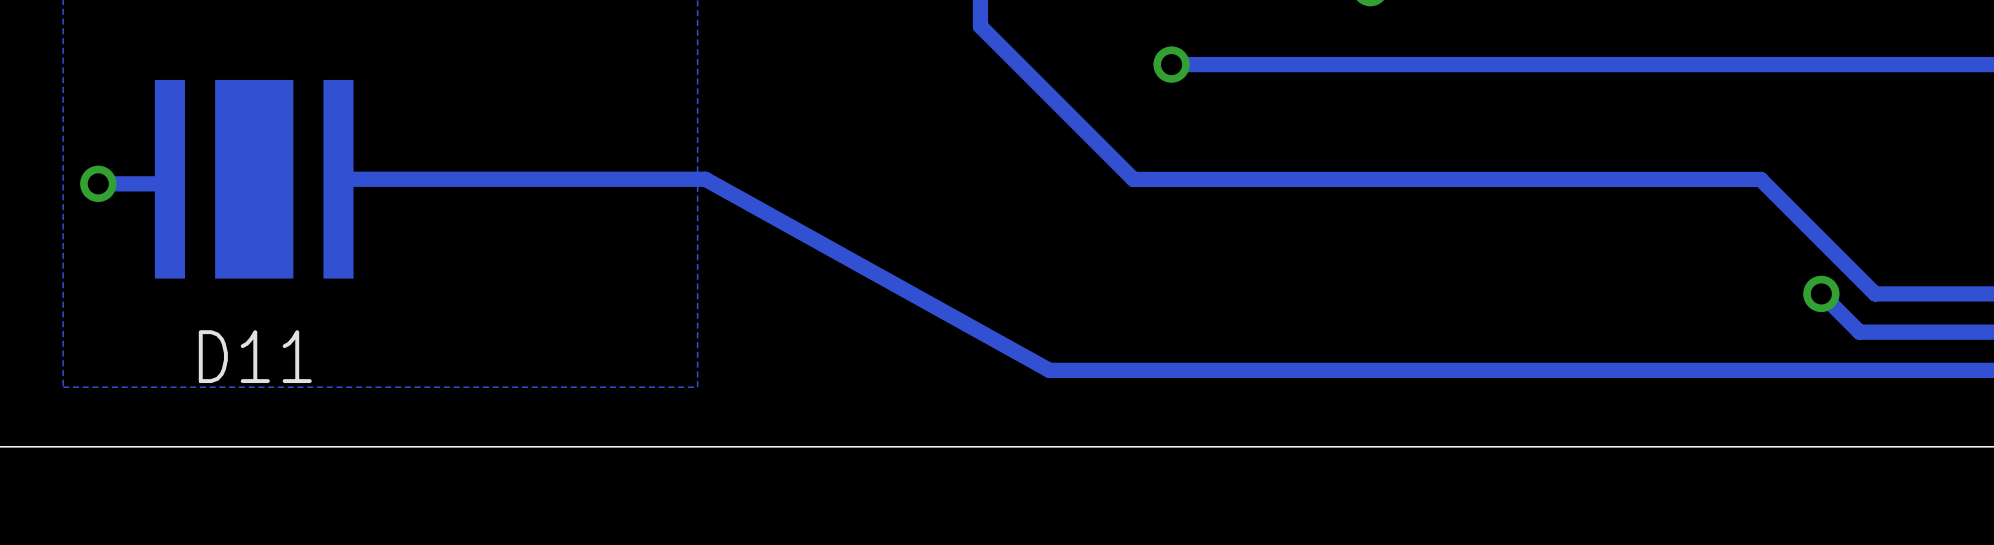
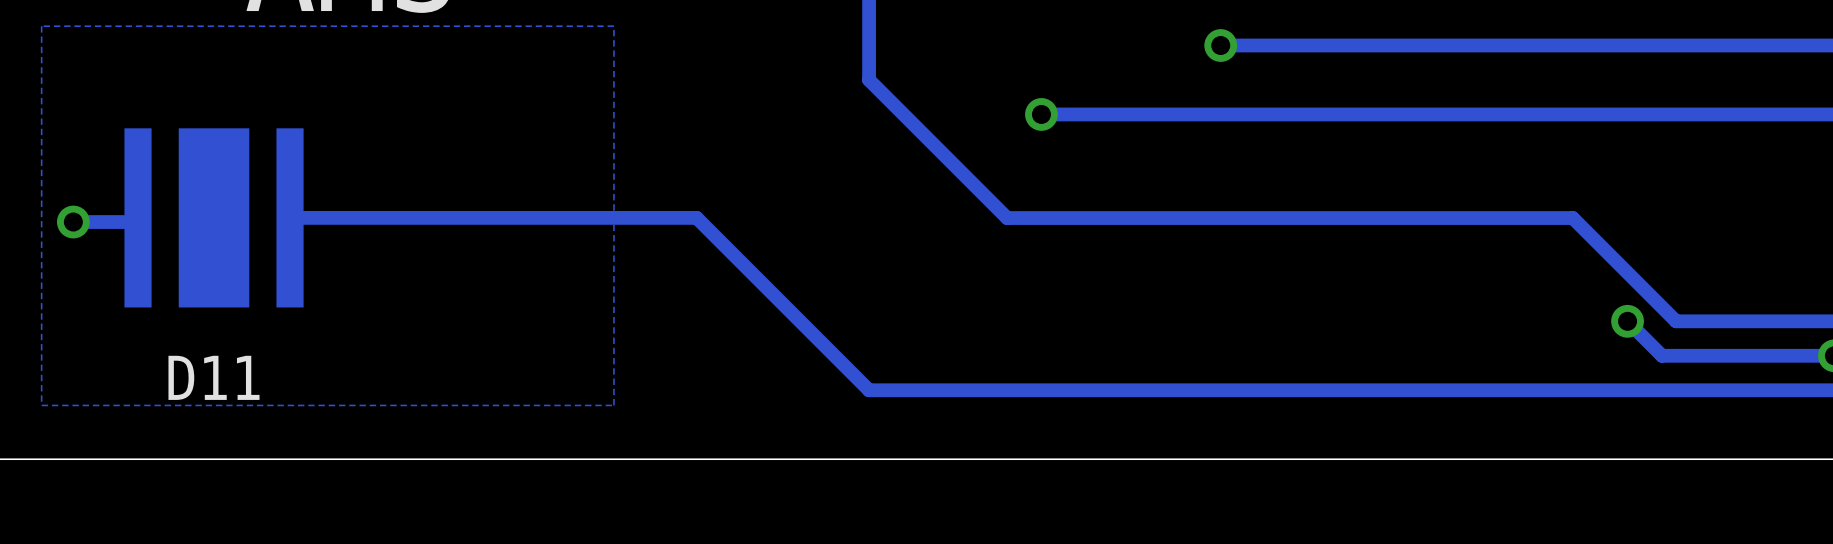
track: (705, 179) (1049, 370) -> (621, 217) (696, 217) (869, 390) (931, 390)

